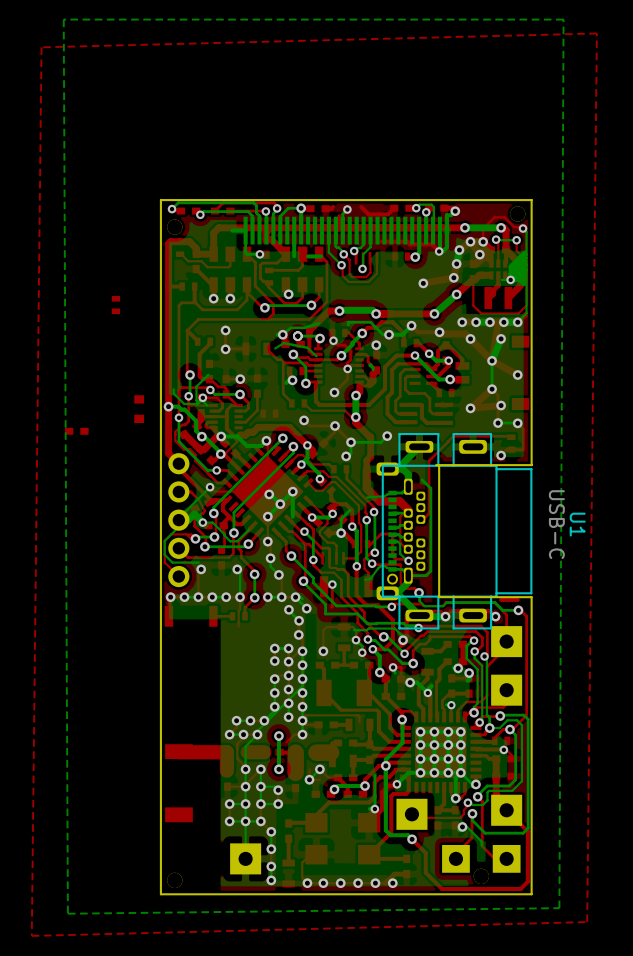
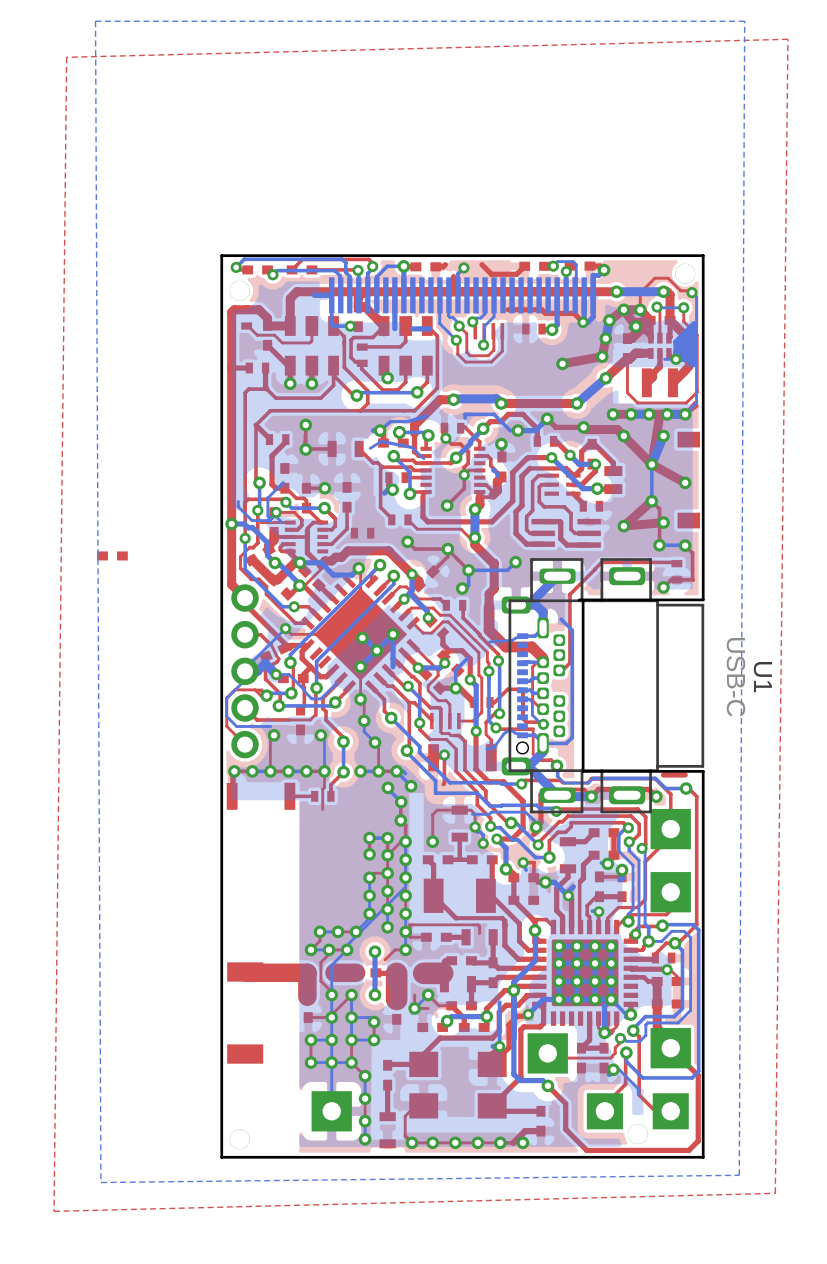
part: (115, 305) -> none
part: (139, 409) -> none

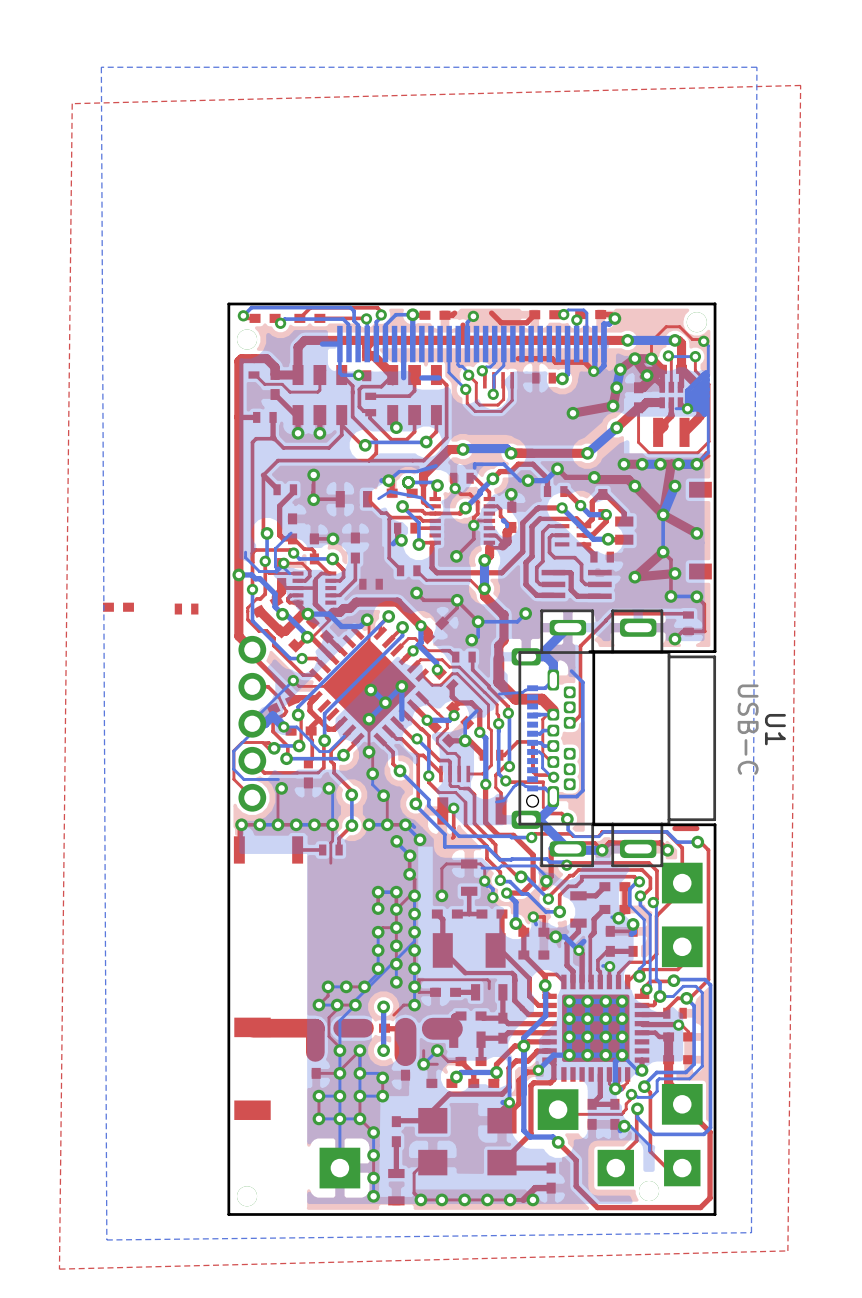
part: none -> (186, 609)

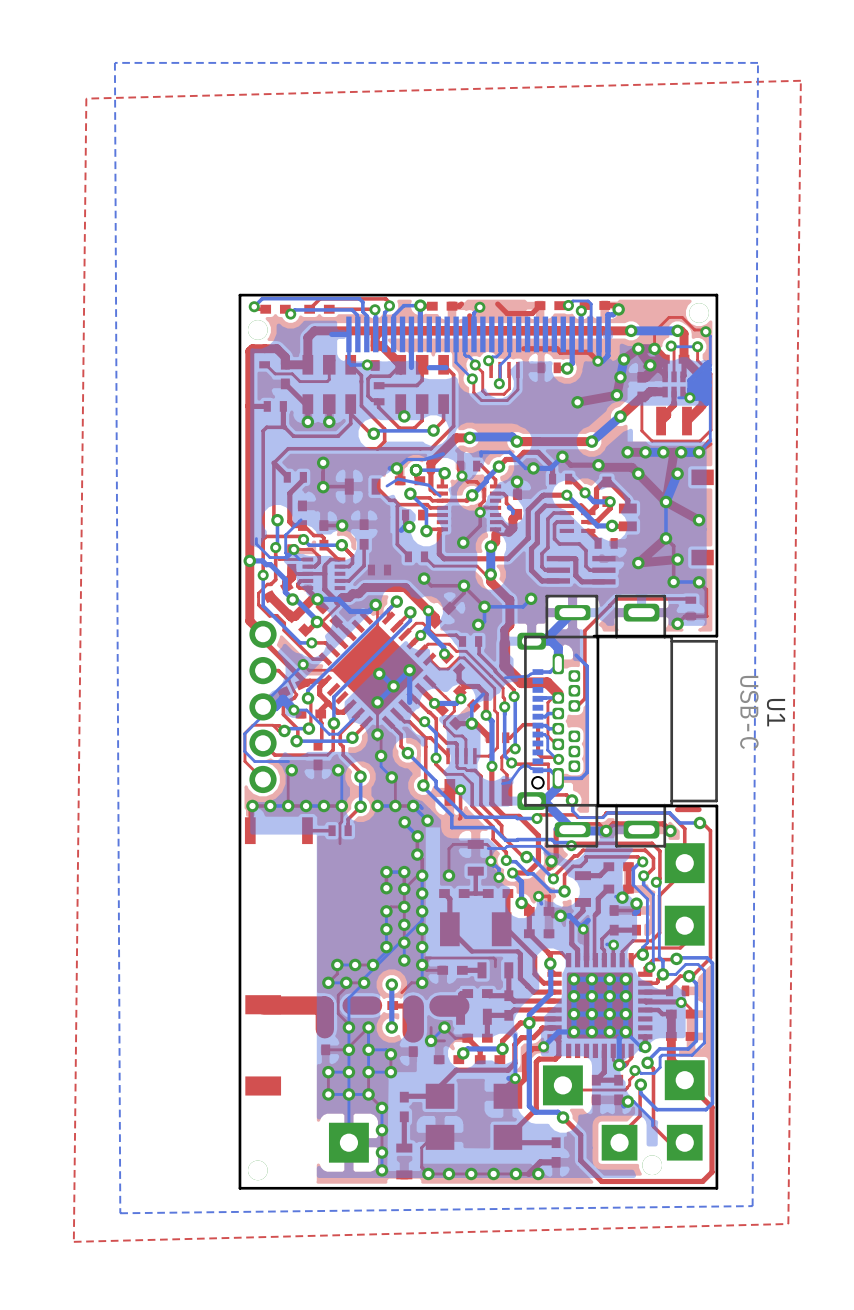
part: (118, 607) -> none
part: (186, 609) -> none

